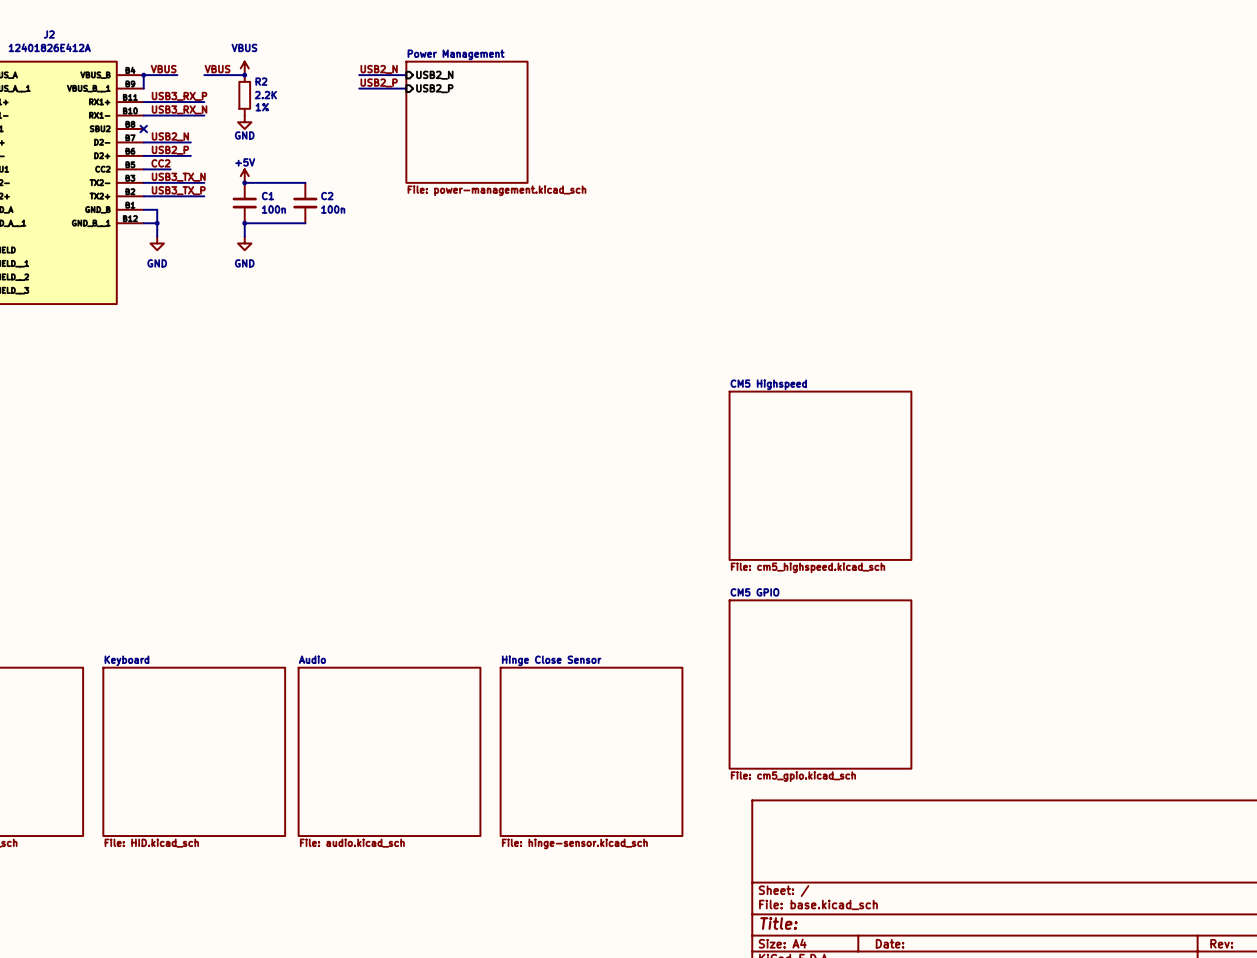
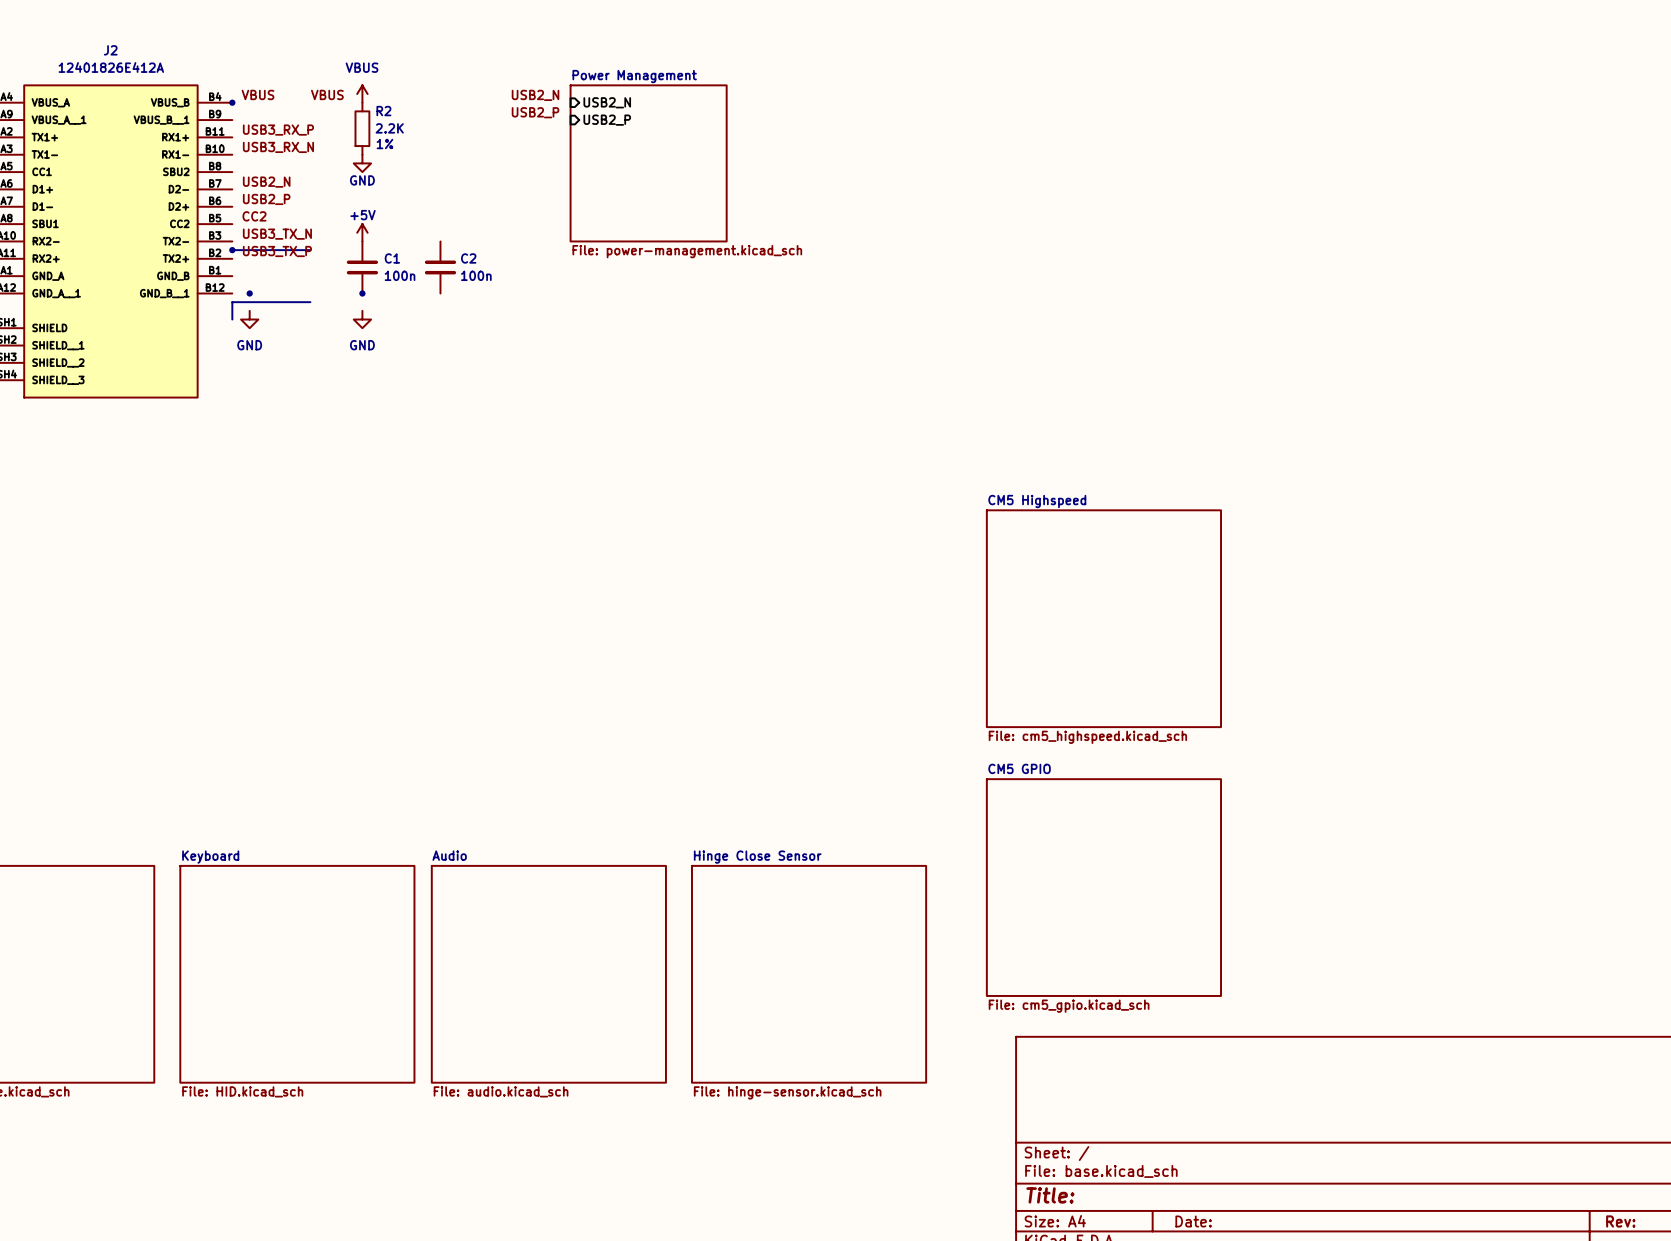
wire: (177, 75) (143, 75) (143, 88) -> none
wire: (204, 75) (244, 75) -> none
junction: (244, 75) -> none
wire: (359, 75) (406, 75) -> none
wire: (359, 88) (406, 88) -> none
wire: (143, 102) (204, 102) -> none
wire: (143, 115) (204, 115) -> none
no-connect mark: (143, 128) -> none
wire: (143, 142) (190, 142) -> none
wire: (143, 155) (190, 155) -> none
wire: (143, 169) (170, 169) -> none
wire: (143, 182) (204, 182) -> none
wire: (244, 182) (305, 182) -> (232, 250) (310, 250)
junction: (244, 182) -> none
junction: none -> (232, 250)
wire: (143, 196) (204, 196) -> none
wire: (143, 209) (157, 209) (157, 236) -> none
wire: (143, 223) (157, 223) -> none
wire: (305, 223) (244, 223) (244, 236) -> (310, 302) (232, 302) (232, 319)

